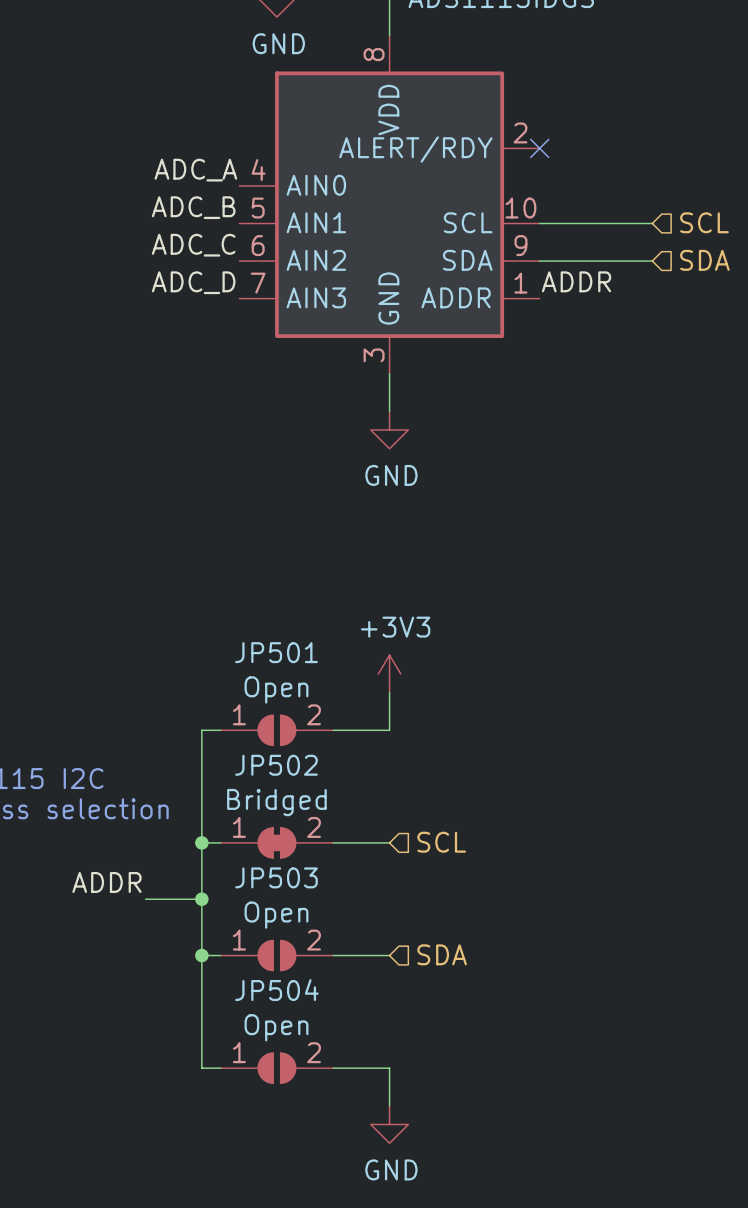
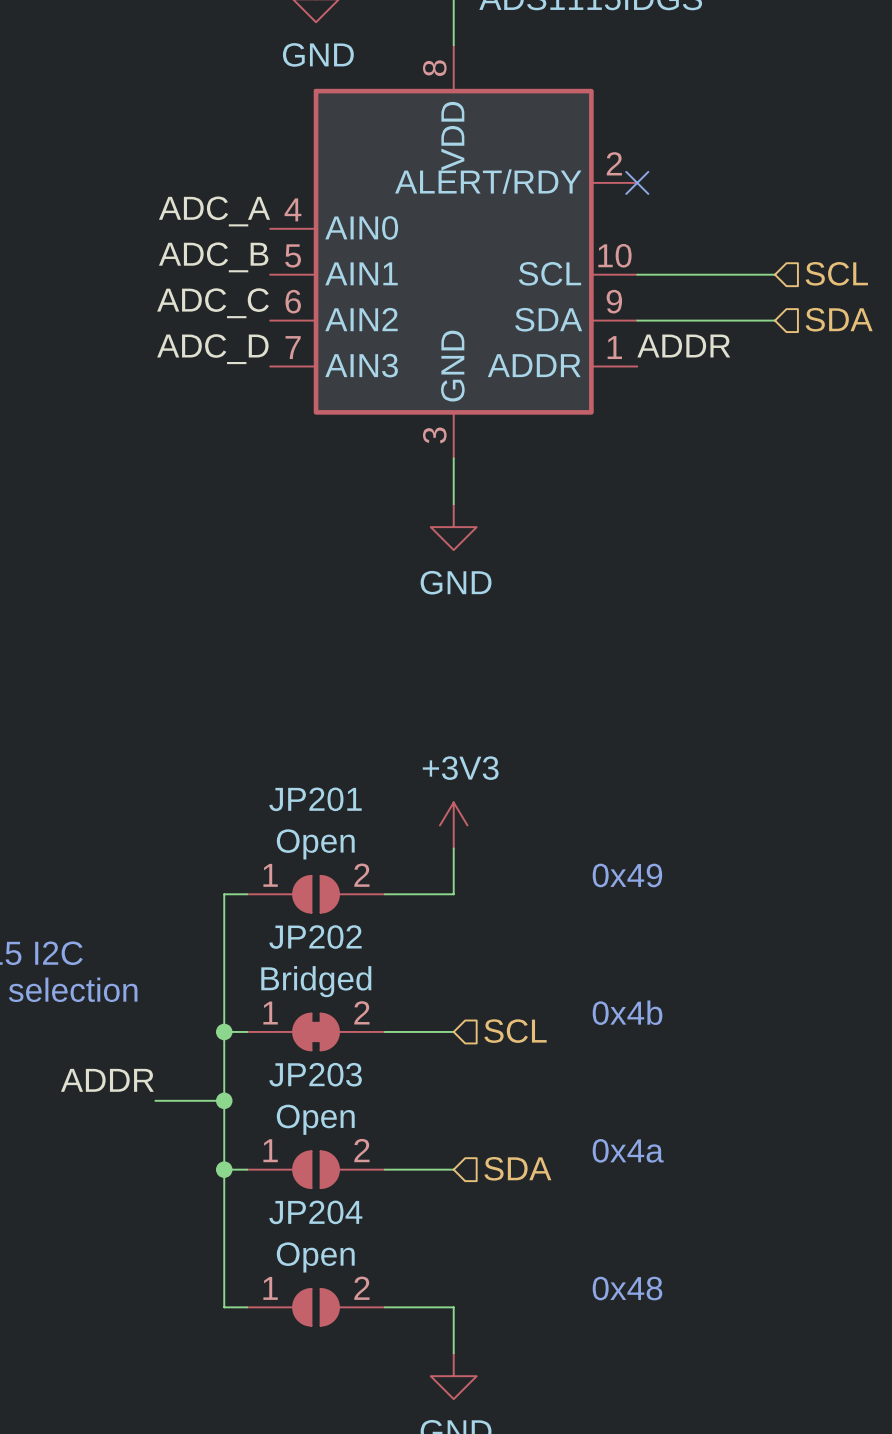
JP501 name: JP501 (276, 652) -> JP201 (315, 799)
text: none -> 0x49 (627, 875)
JP502 name: JP502 (276, 765) -> JP202 (315, 937)
text: none -> 0x4b (627, 1012)
JP503 name: JP503 (276, 877) -> JP203 (315, 1074)
text: none -> 0x4a (628, 1150)
JP504 name: JP504 (276, 990) -> JP204 (315, 1212)
text: none -> 0x48 (627, 1288)

